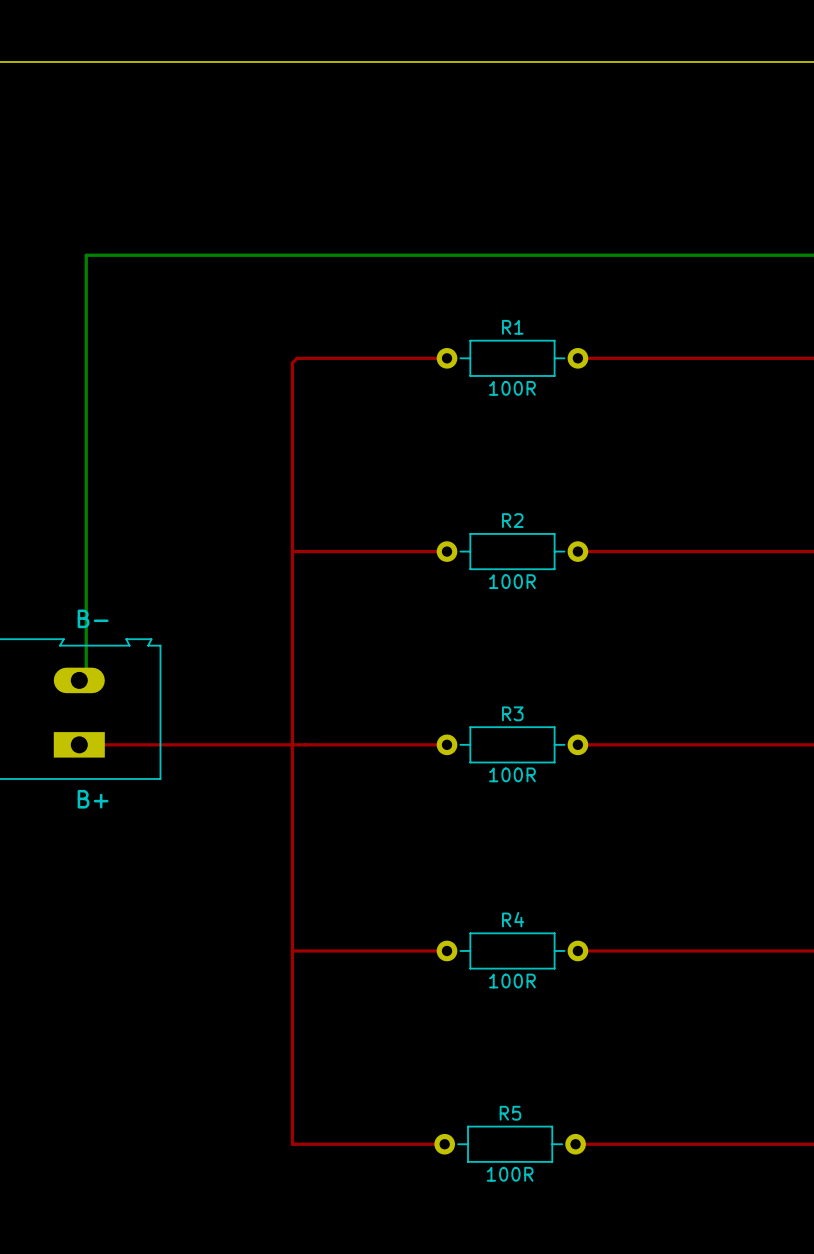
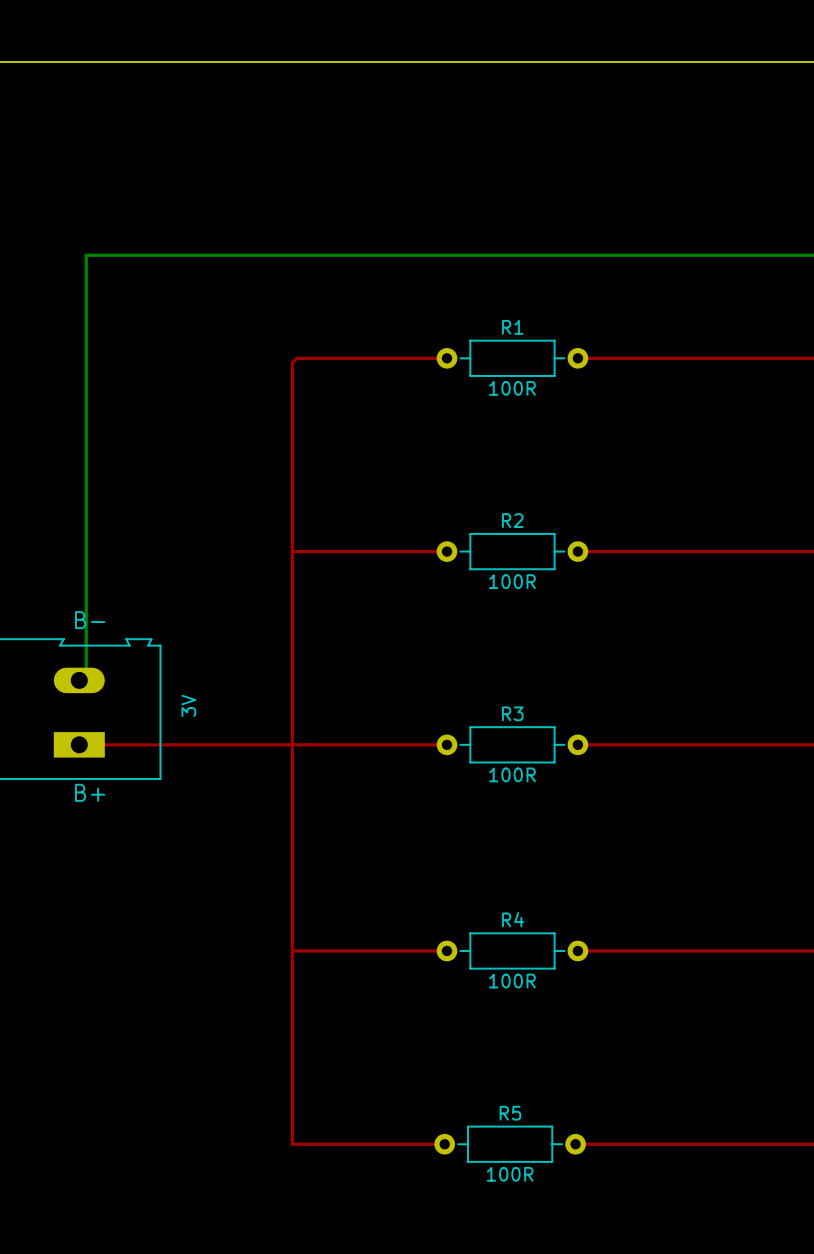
text: B- (93, 618) -> none
part text: none -> B- (90, 620)
part value: none -> 3V (188, 705)
part text: none -> B+ (90, 792)
text: B+ (93, 799) -> none

